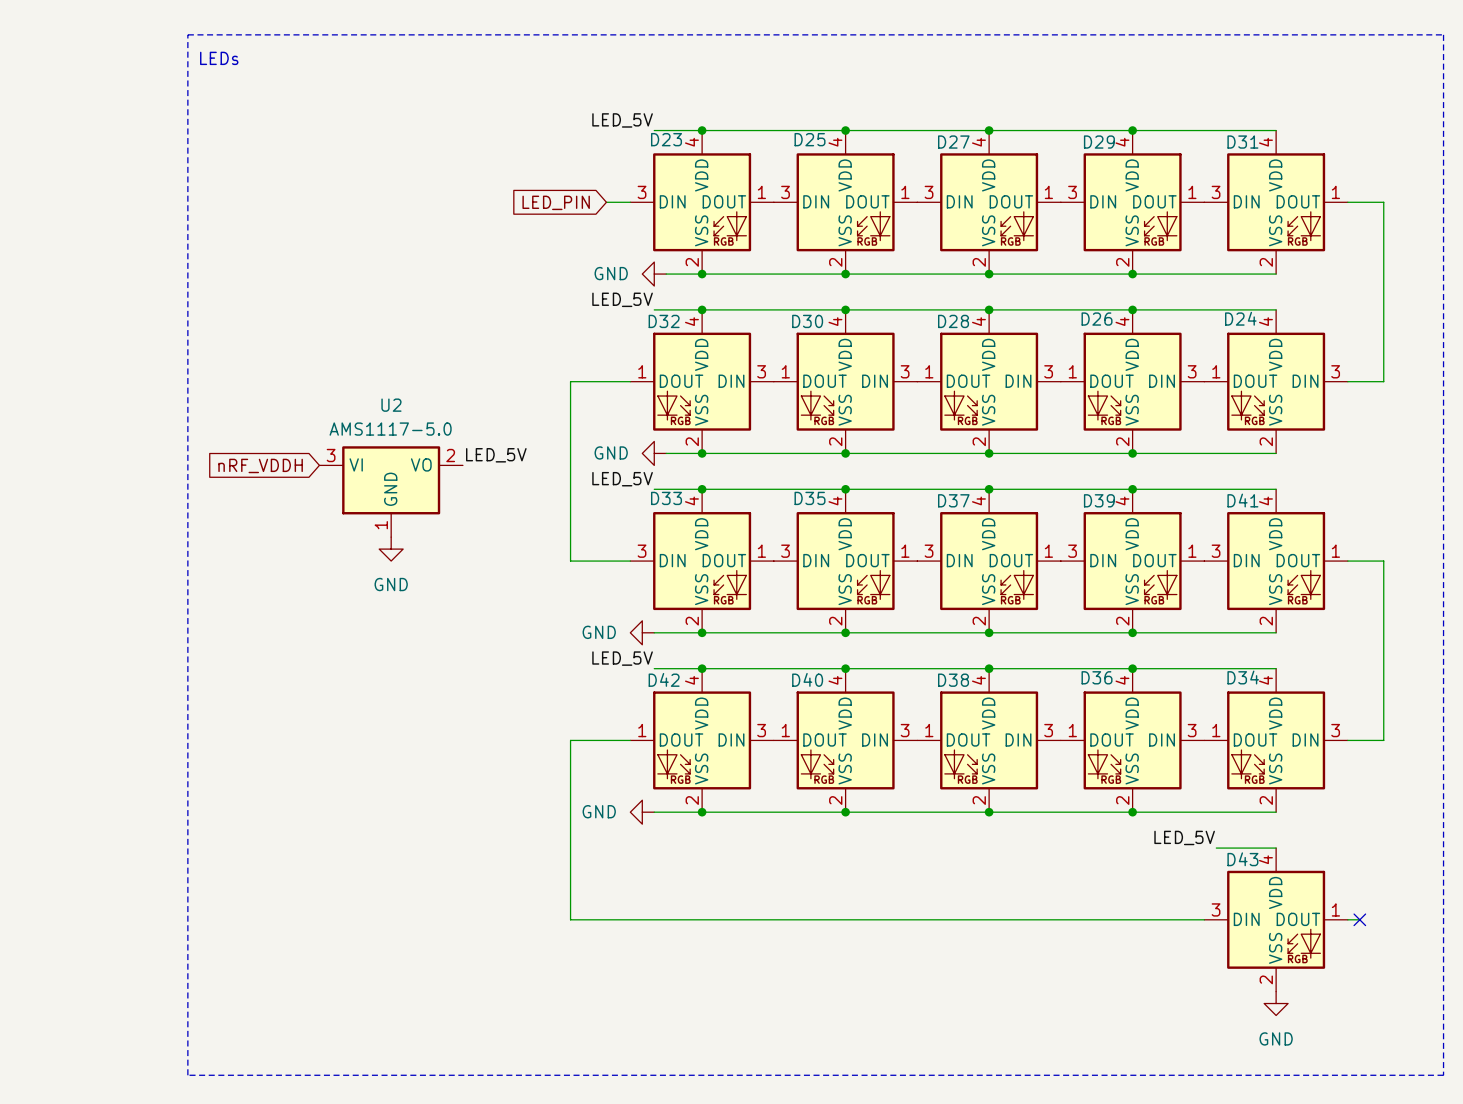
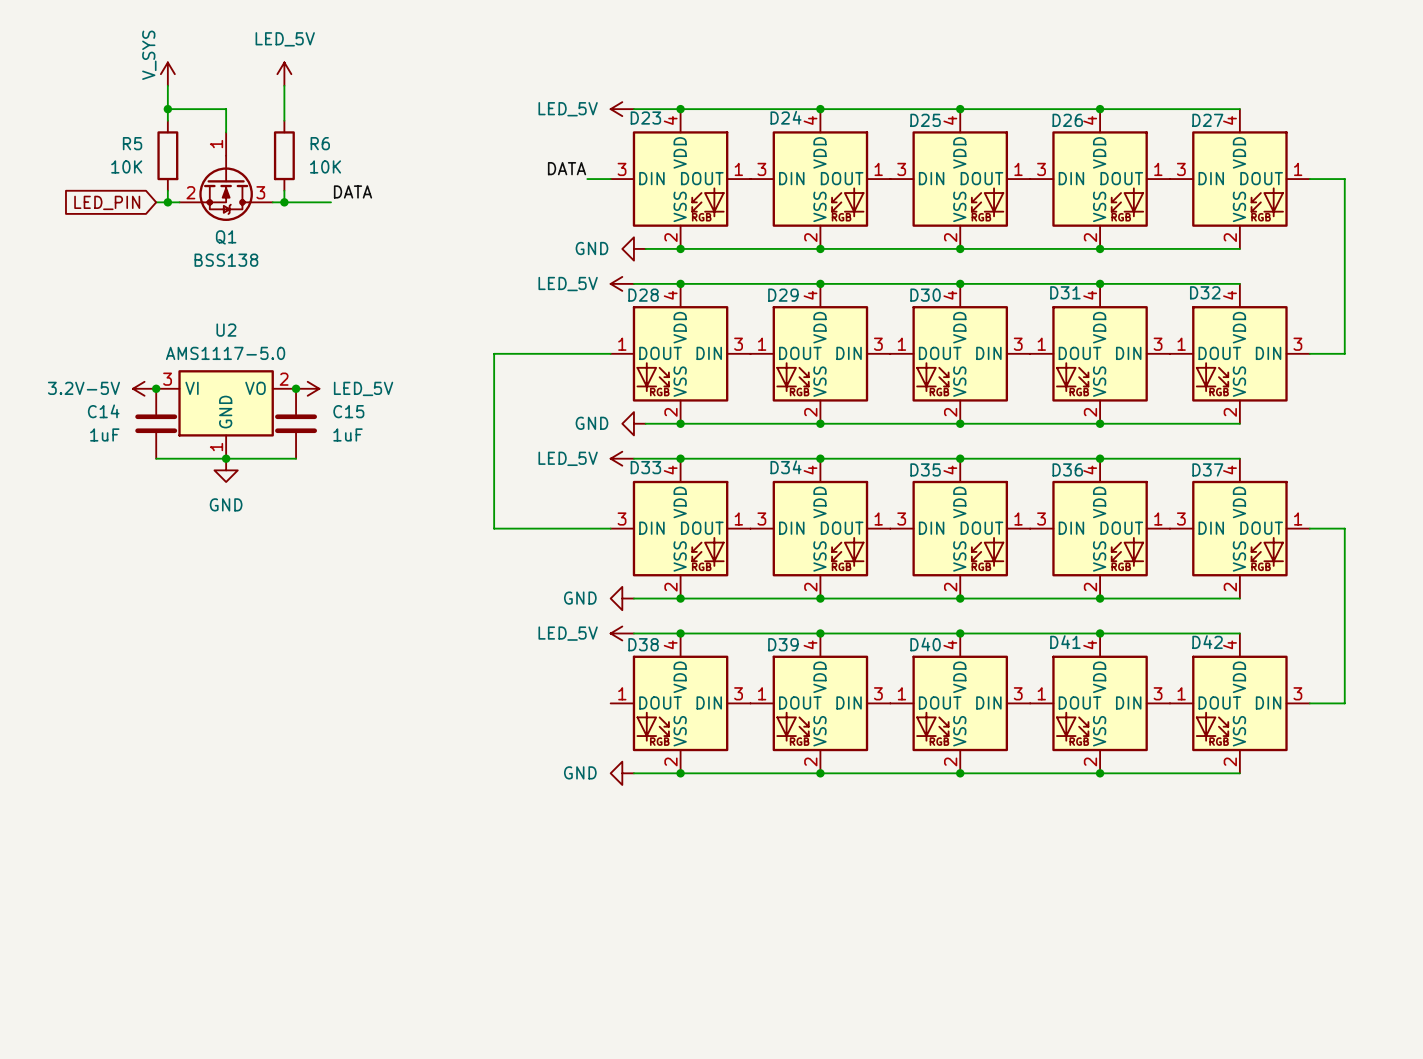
line: (187, 34) (1443, 34) (1443, 1075) (187, 1075) (187, 34) -> none
text: LEDs (219, 58) -> none
power symbol: none -> V_SYS (167, 74)
power symbol: none -> LED_5V (284, 74)
wire: none -> (167, 85) (167, 120)
wire: none -> (284, 85) (284, 120)
label: LED_5V (622, 120) -> none
wire: none -> (167, 109) (226, 109) (226, 132)
junction: none -> (167, 109)
power symbol: none -> LED_5V (622, 109)
D25 name: D25 (810, 139) -> D24 (786, 117)
D27 name: D27 (953, 142) -> D25 (925, 120)
D29 name: D29 (1099, 142) -> D26 (1067, 120)
D31 name: D31 (1242, 142) -> D27 (1207, 120)
R5: none -> 10K (167, 155)
R6: none -> 10K (284, 155)
label: none -> DATA (567, 168)
Q1: none -> BSS138 (226, 176)
global label: LED_PIN (556, 202) -> none
wire: none -> (167, 190) (167, 202)
wire: none -> (284, 190) (284, 202)
label: none -> DATA (353, 191)
global label: none -> LED_PIN (107, 202)
wire: none -> (156, 202) (179, 202)
junction: none -> (167, 202)
wire: none -> (272, 202) (331, 202)
junction: none -> (284, 202)
label: LED_5V (622, 299) -> none
power symbol: none -> LED_5V (622, 283)
D24 name: D24 (1240, 318) -> D32 (1205, 292)
D26 name: D26 (1097, 319) -> D31 (1065, 292)
D32 name: D32 (664, 321) -> D28 (643, 295)
D30 name: D30 (807, 321) -> D29 (783, 295)
D28 name: D28 (953, 321) -> D30 (925, 295)
wire: (570, 381) (570, 561) -> (552, 353) (494, 353) (494, 528) (552, 528)
power symbol: none -> 3.2V-5V (144, 388)
junction: none -> (156, 388)
junction: none -> (296, 388)
power symbol: none -> LED_5V (307, 388)
C14: none -> 1uF (156, 423)
C15: none -> 1uF (296, 423)
label: LED_5V (496, 455) -> none
global label: nRF_VDDH (260, 465) -> none
label: LED_5V (622, 479) -> none
wire: none -> (156, 458) (296, 458)
junction: none -> (226, 458)
power symbol: none -> LED_5V (622, 458)
U2 position: (391, 491) -> (226, 414)
D35 name: D35 (810, 498) -> D34 (786, 467)
D37 name: D37 (953, 500) -> D35 (925, 469)
D39 name: D39 (1099, 500) -> D36 (1067, 469)
D41 name: D41 (1242, 500) -> D37 (1207, 469)
power symbol position: GND (391, 549) -> GND (226, 470)
label: LED_5V (622, 658) -> none
power symbol: none -> LED_5V (622, 633)
D36 name: D36 (1097, 677) -> D41 (1065, 642)
D34 name: D34 (1243, 677) -> D42 (1207, 642)
D42 name: D42 (664, 679) -> D38 (643, 644)
D40 name: D40 (807, 679) -> D39 (783, 644)
D38 name: D38 (953, 680) -> D40 (925, 644)
wire: (630, 740) (570, 740) (570, 919) (1204, 919) -> none
label: LED_5V (1184, 837) -> none
wire: (1216, 848) (1276, 848) -> none
D43: (1276, 919) -> none
wire: (1347, 919) (1359, 919) -> none
no-connect mark: (1359, 919) -> none
power symbol: GND (1276, 1003) -> none

